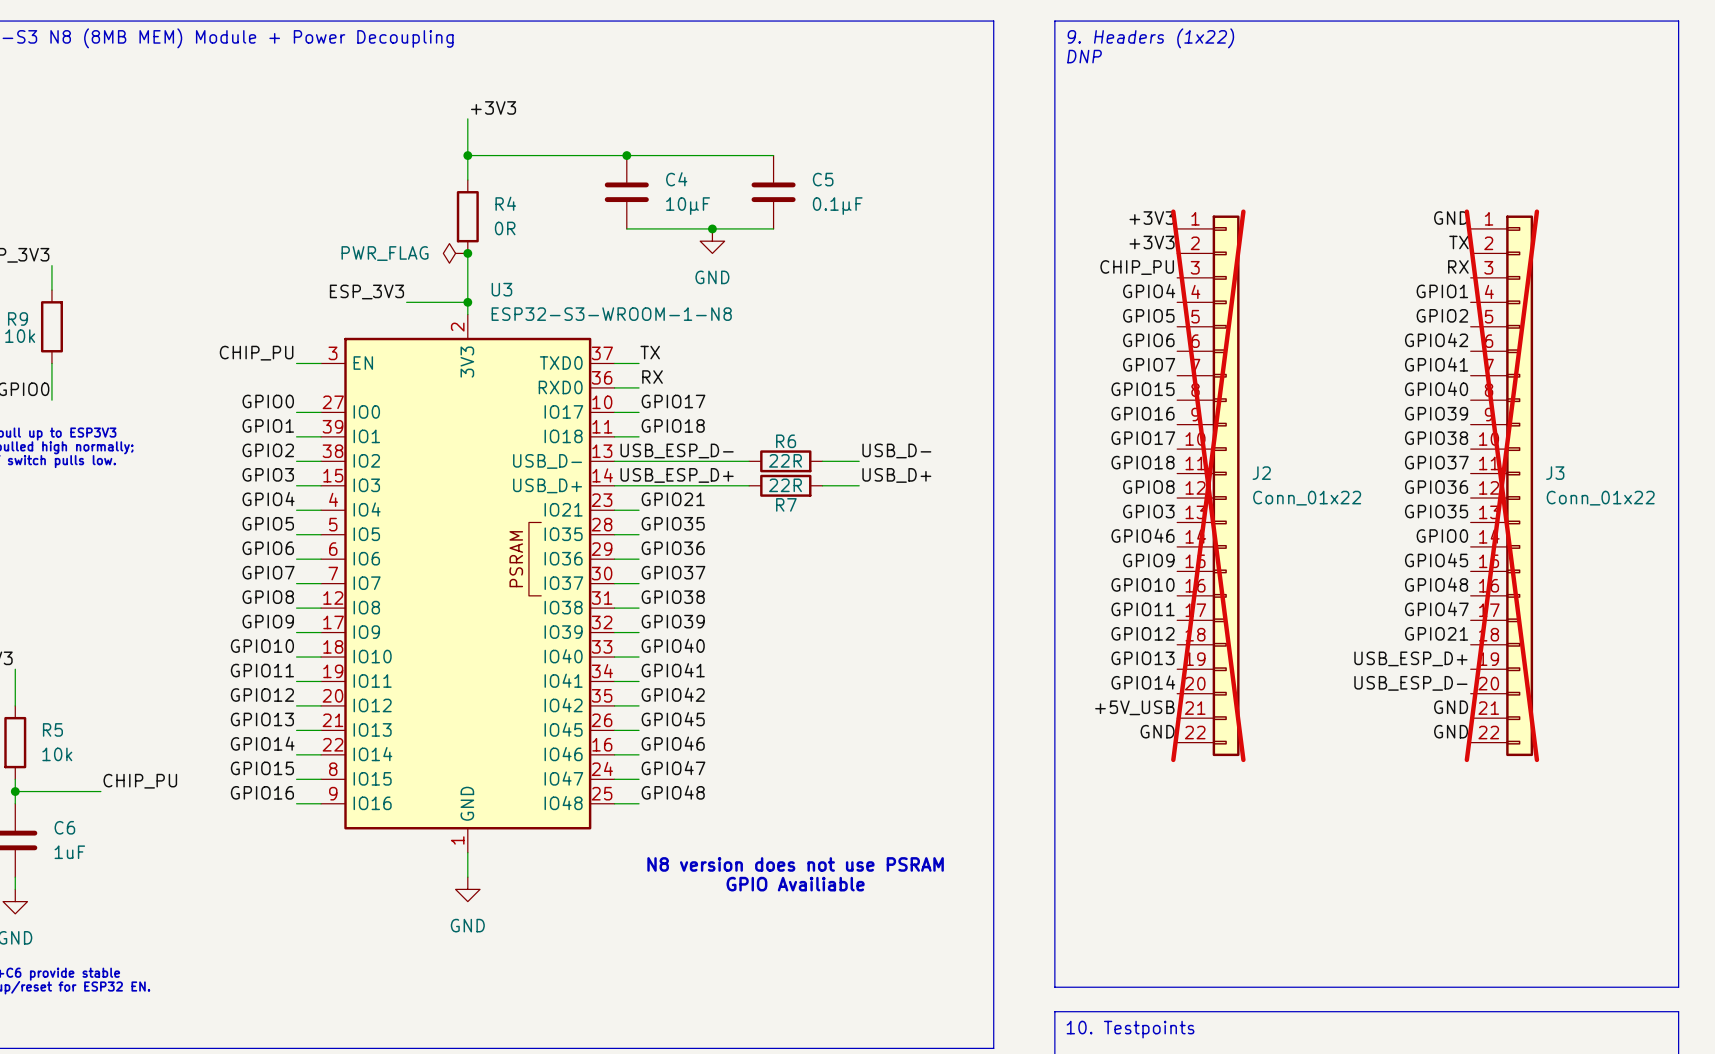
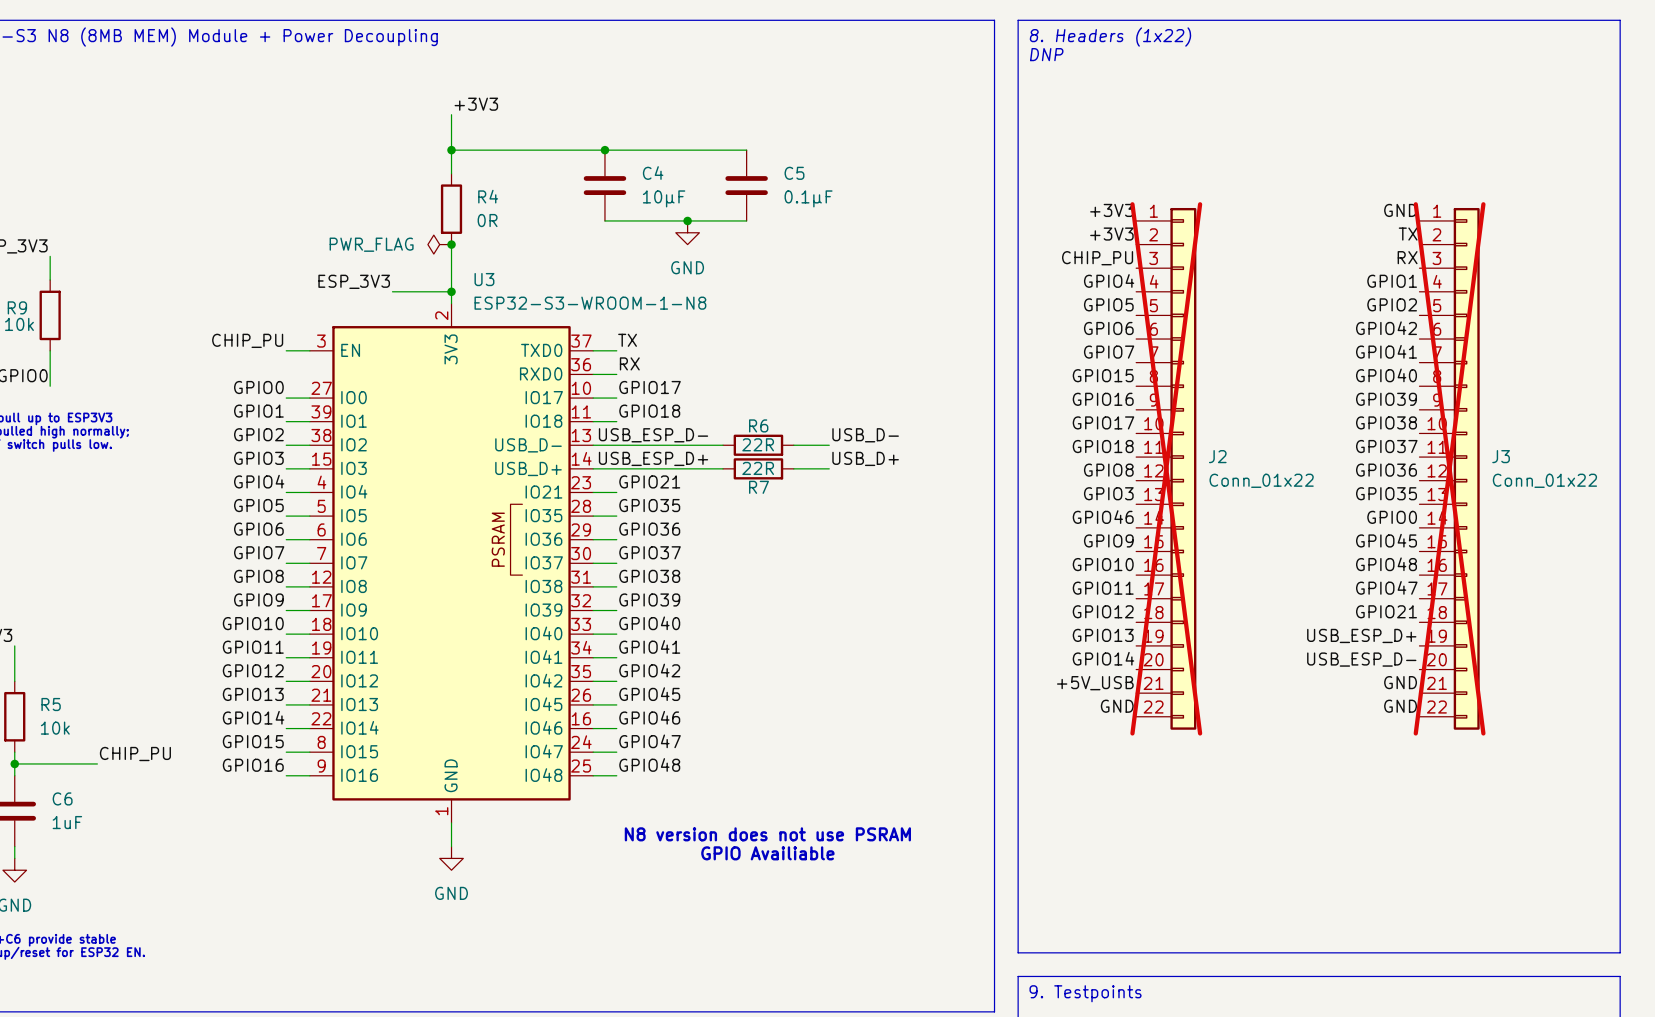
line: (993, 21) (993, 1048) -> (959, 20) (994, 20) (994, 1011) (959, 1011)
text: 9. Headers (1x22) (1150, 38) -> 8. Headers (1x22) (1110, 37)
text: 10. Testpoints (1130, 1029) -> 9. Testpoints (1085, 993)

